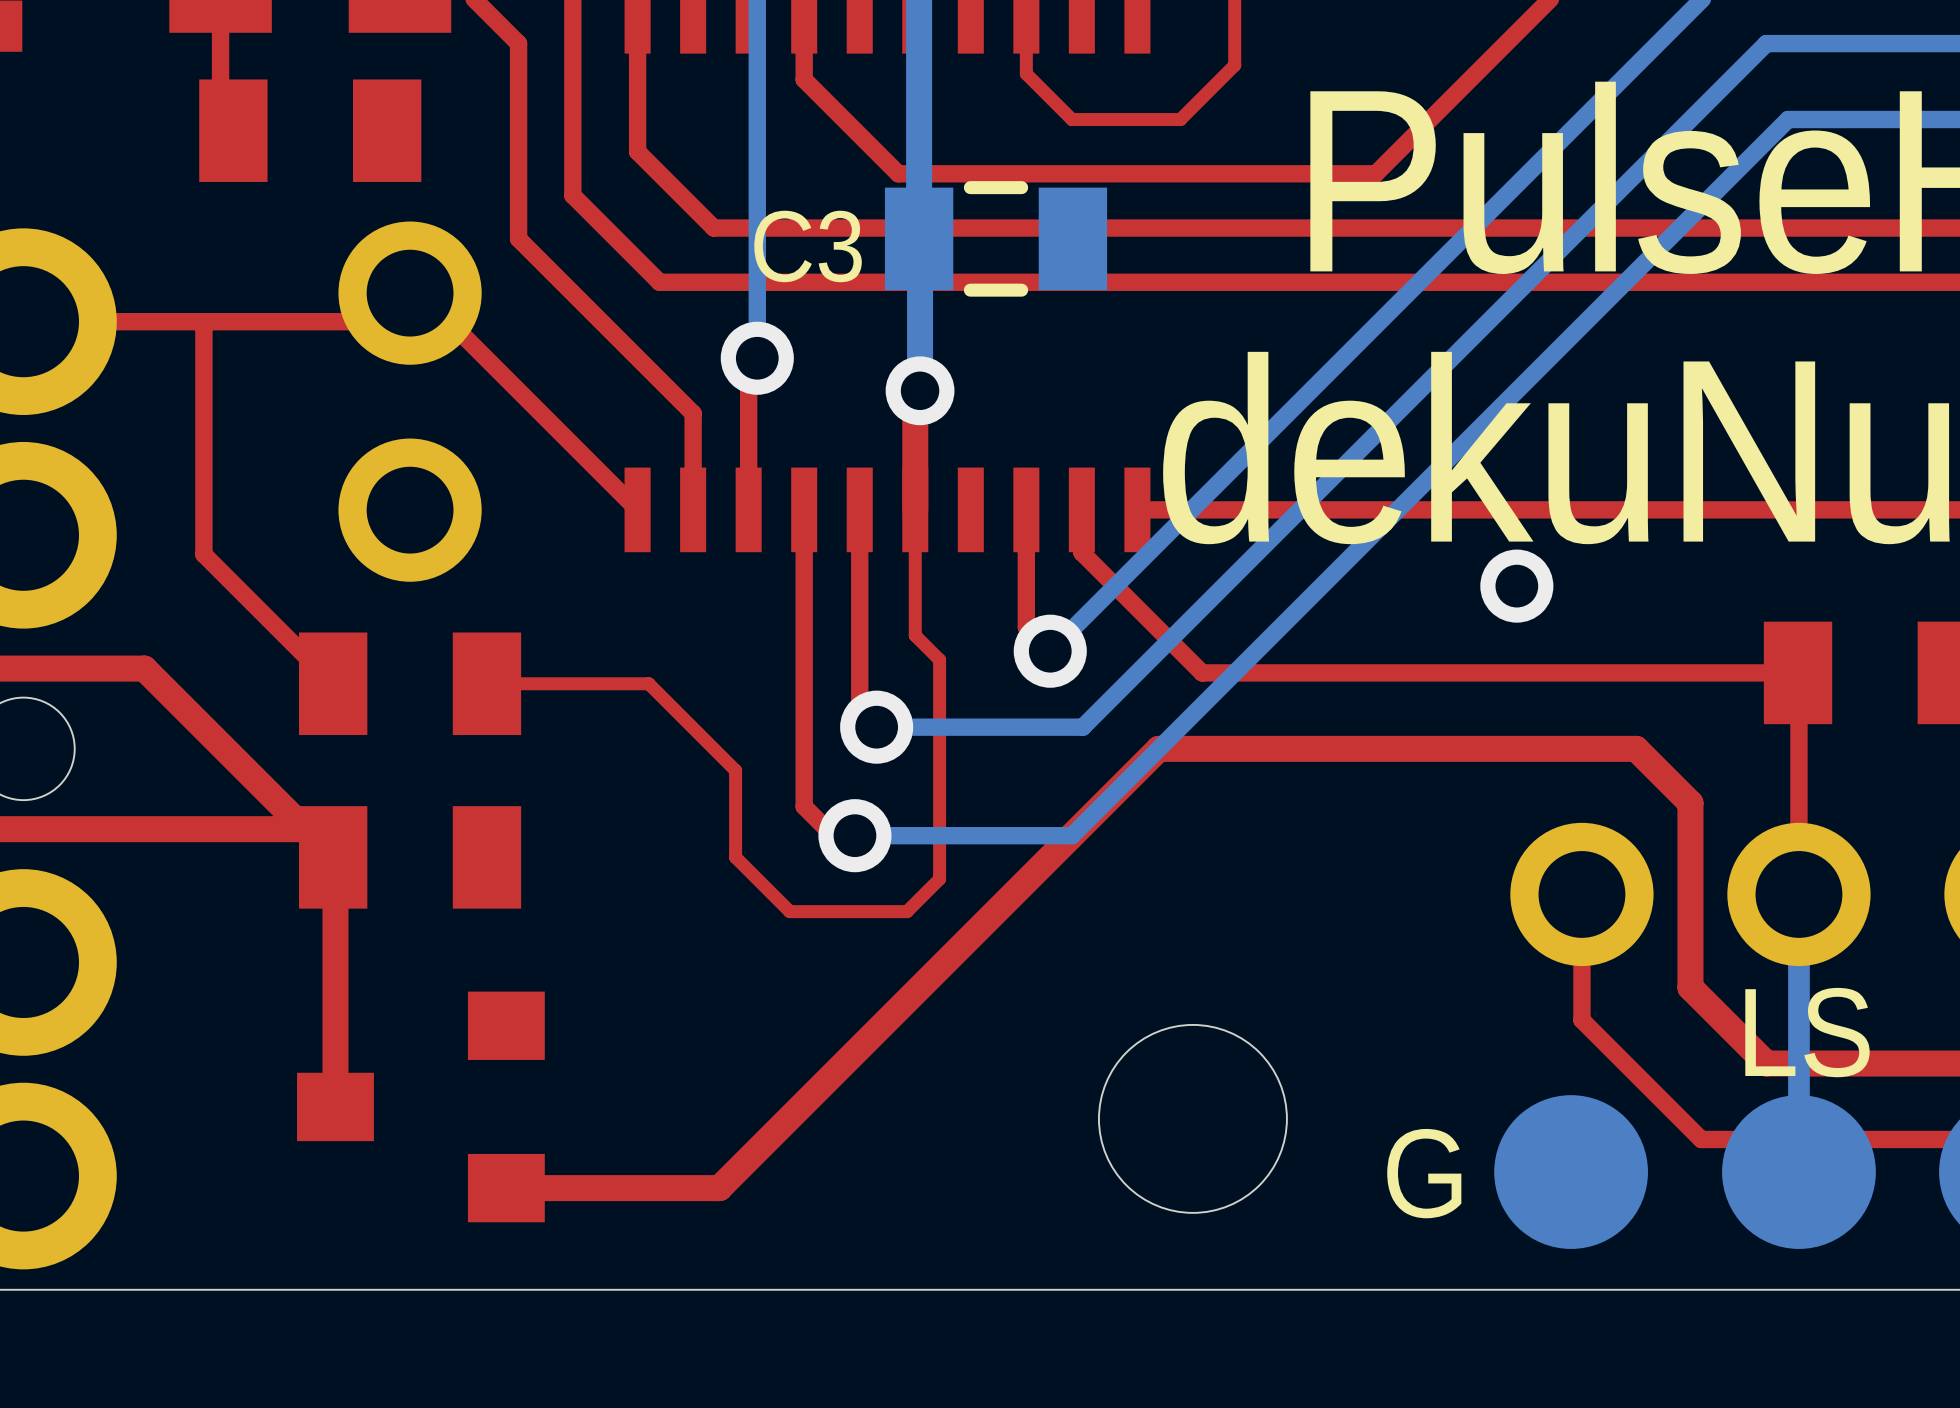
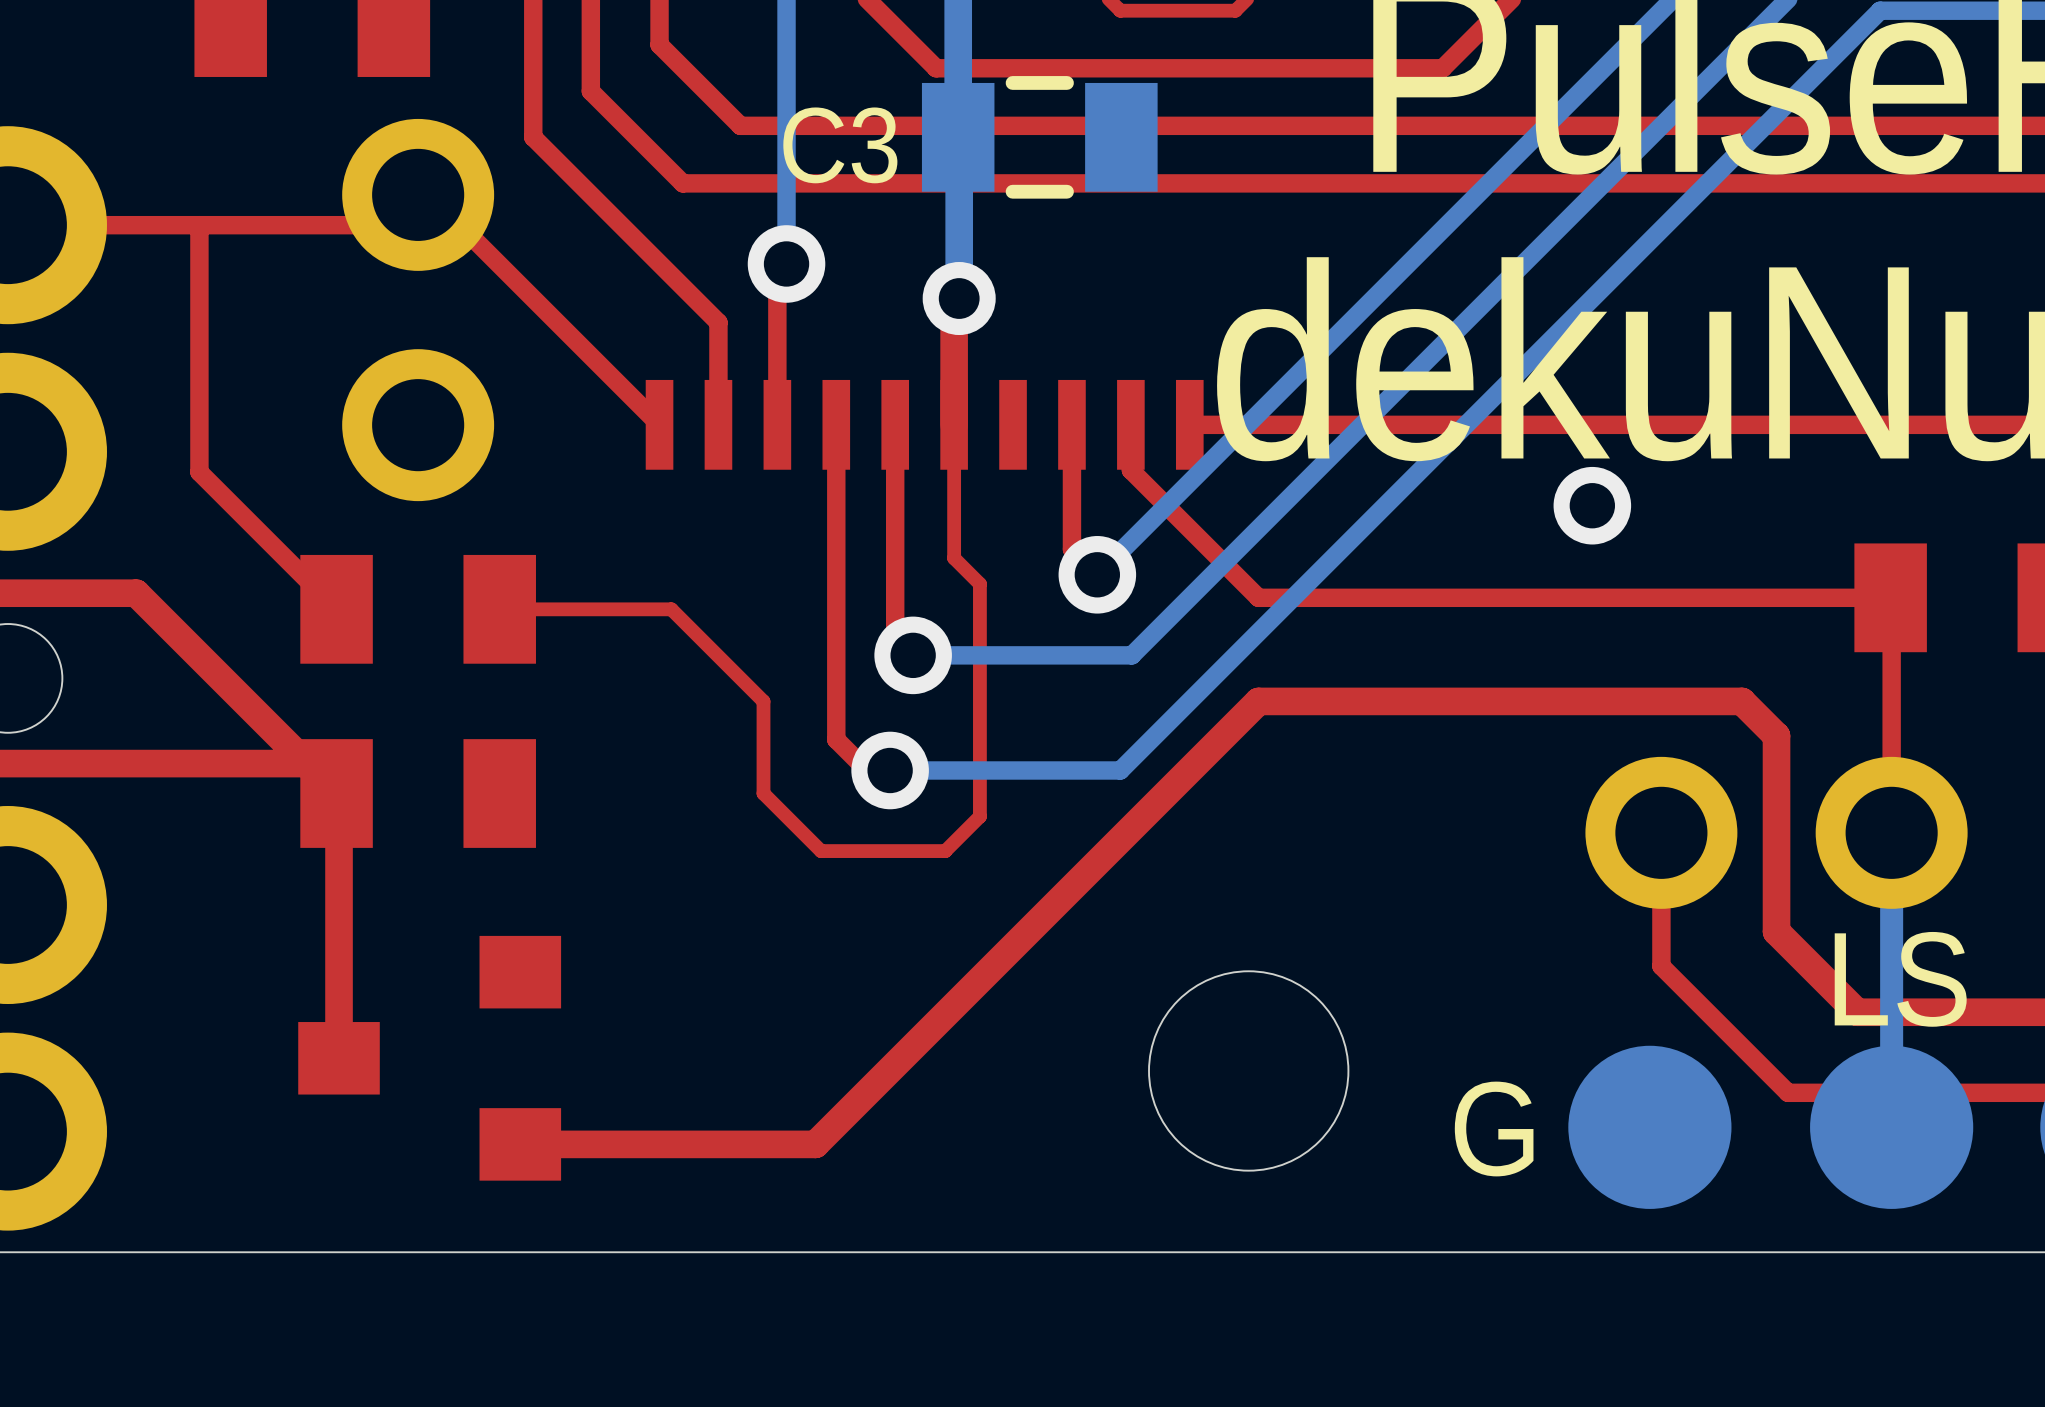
top track: (1657, 770) (1636, 748) (1158, 748) (719, 1188) -> (1741, 701) (1258, 701) (815, 1144) (746, 1144)

